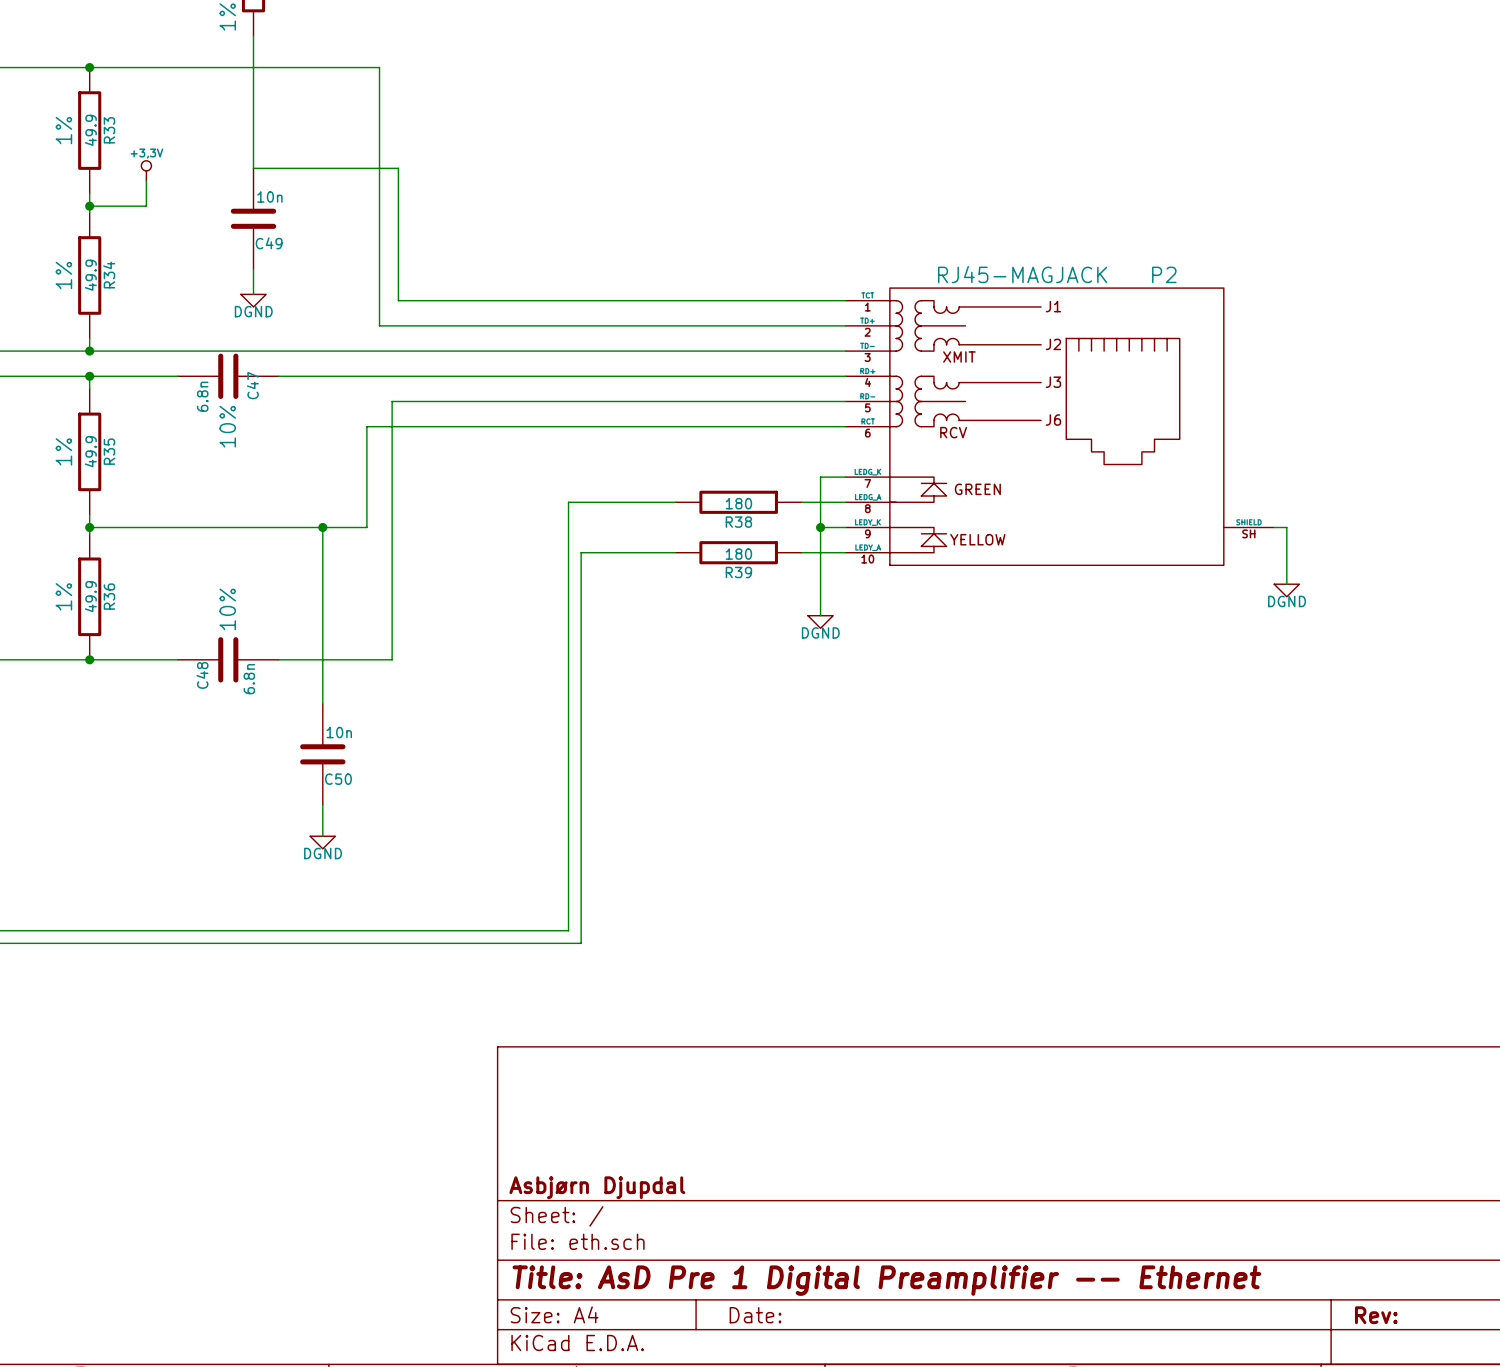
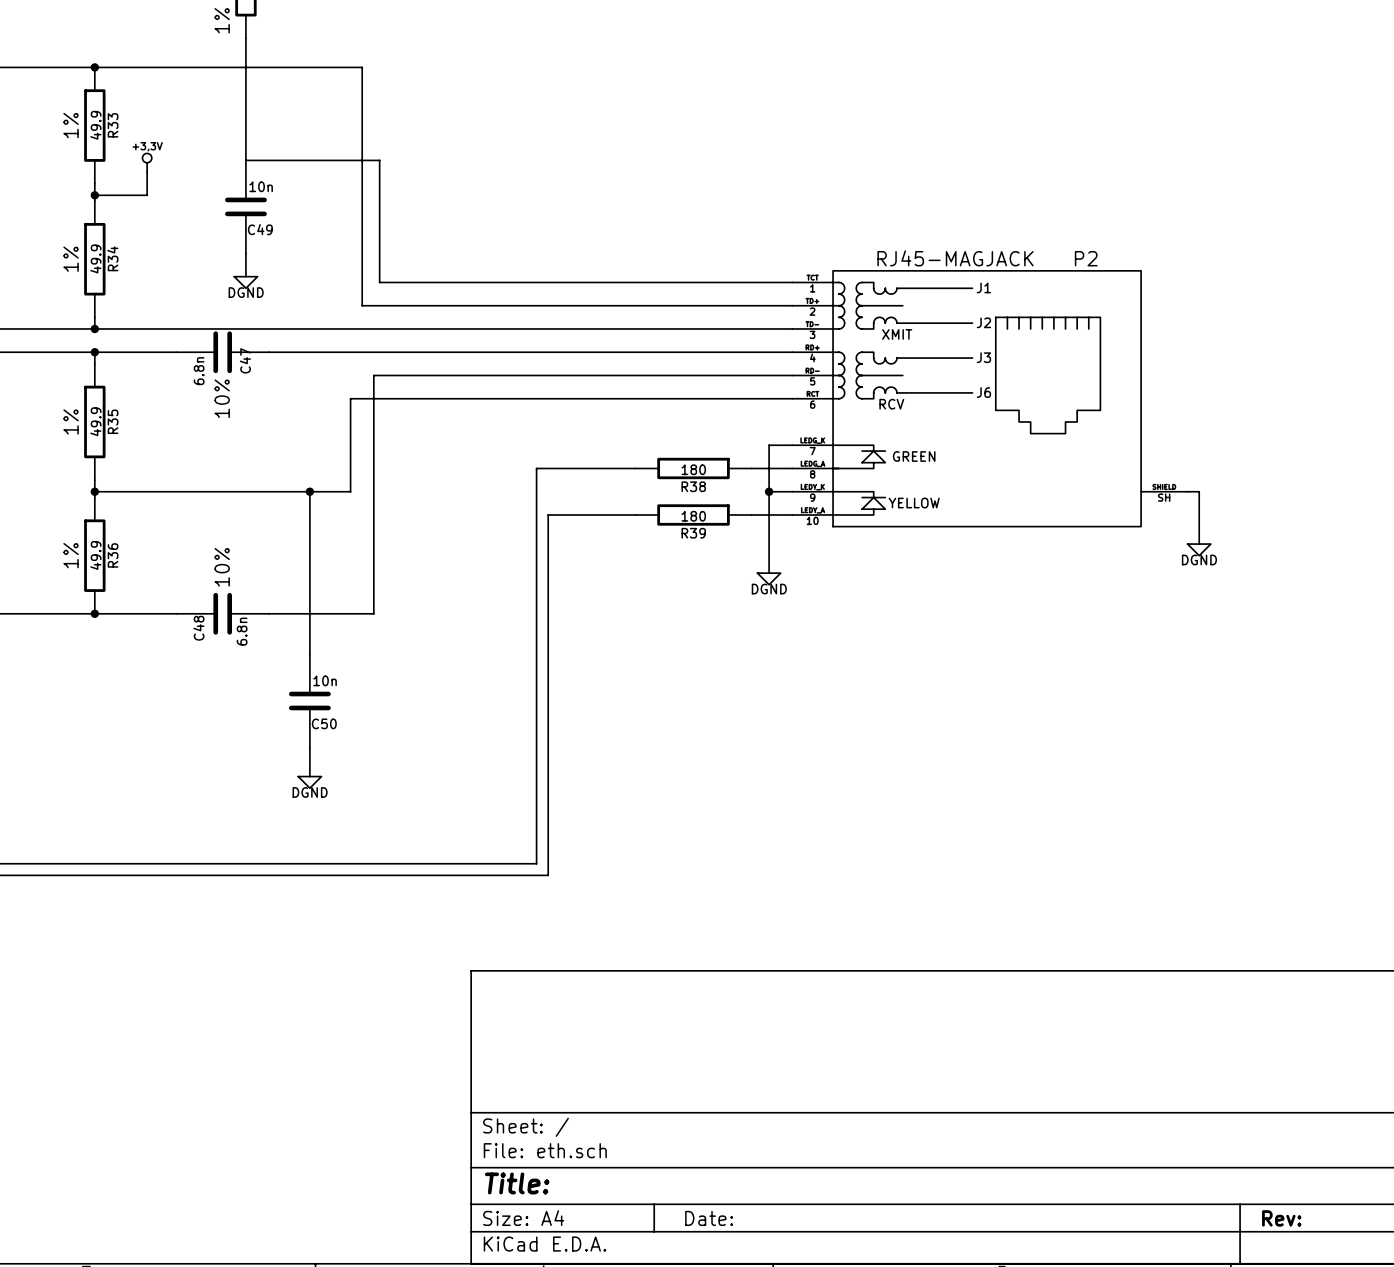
title block: Asbjørn Djupdal (597, 1187) -> none
title block: Title: AsD Pre 1 Digital Preamplifier -- Ethernet (886, 1280) -> Title: (517, 1183)

